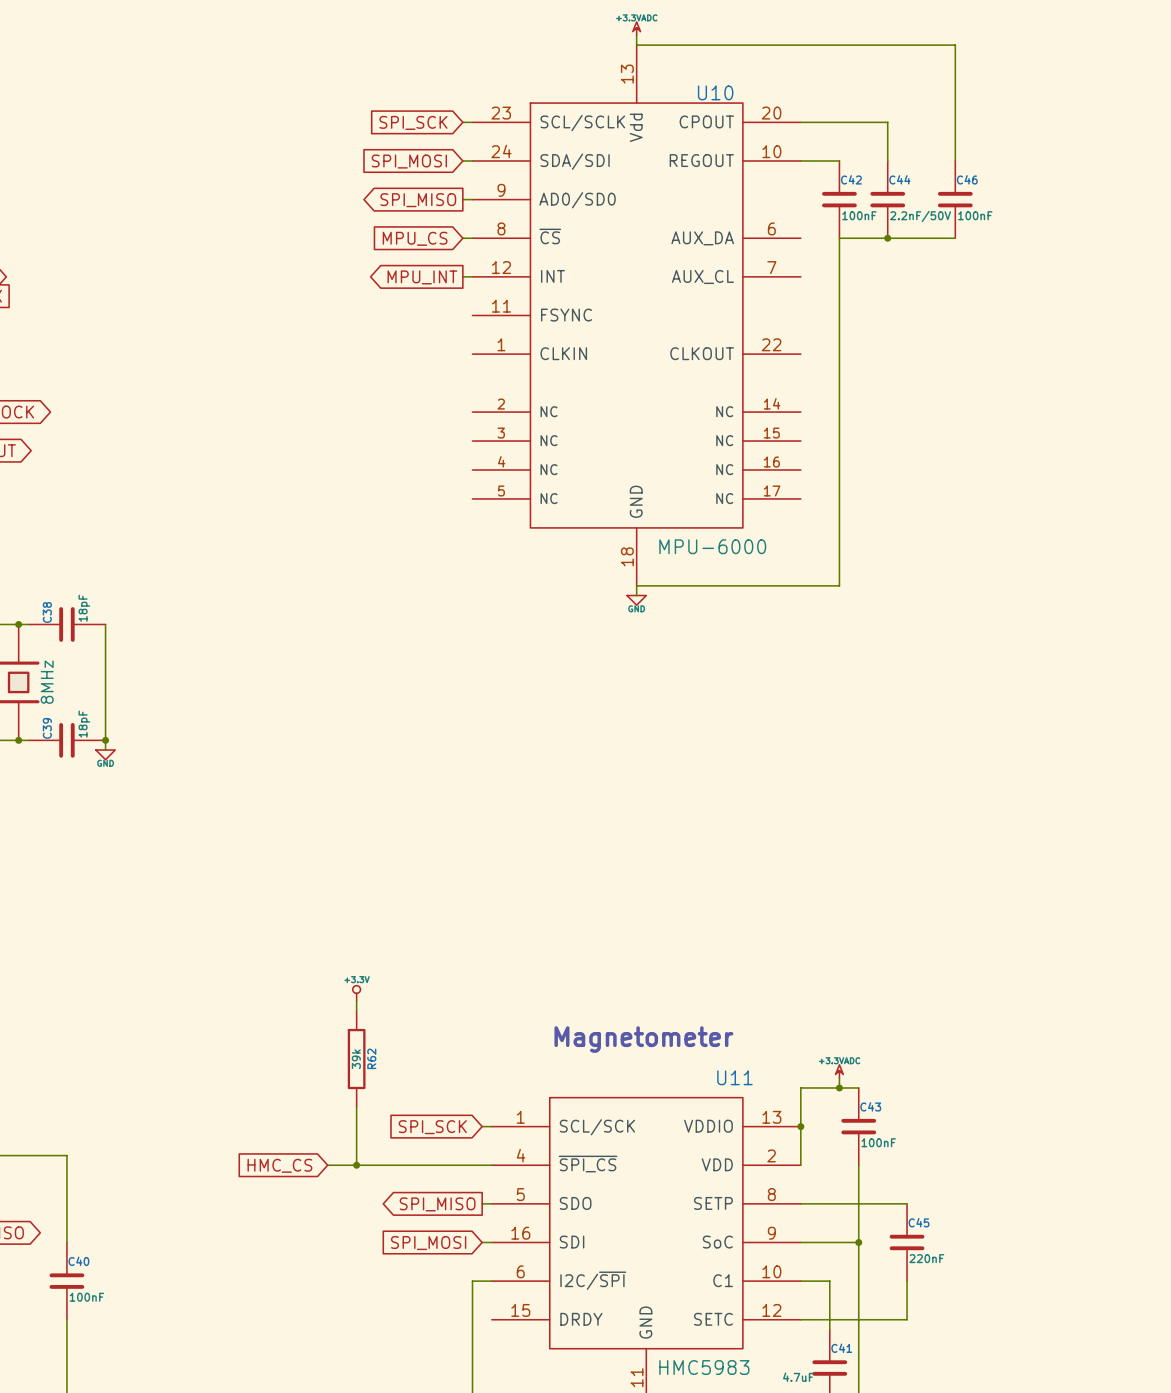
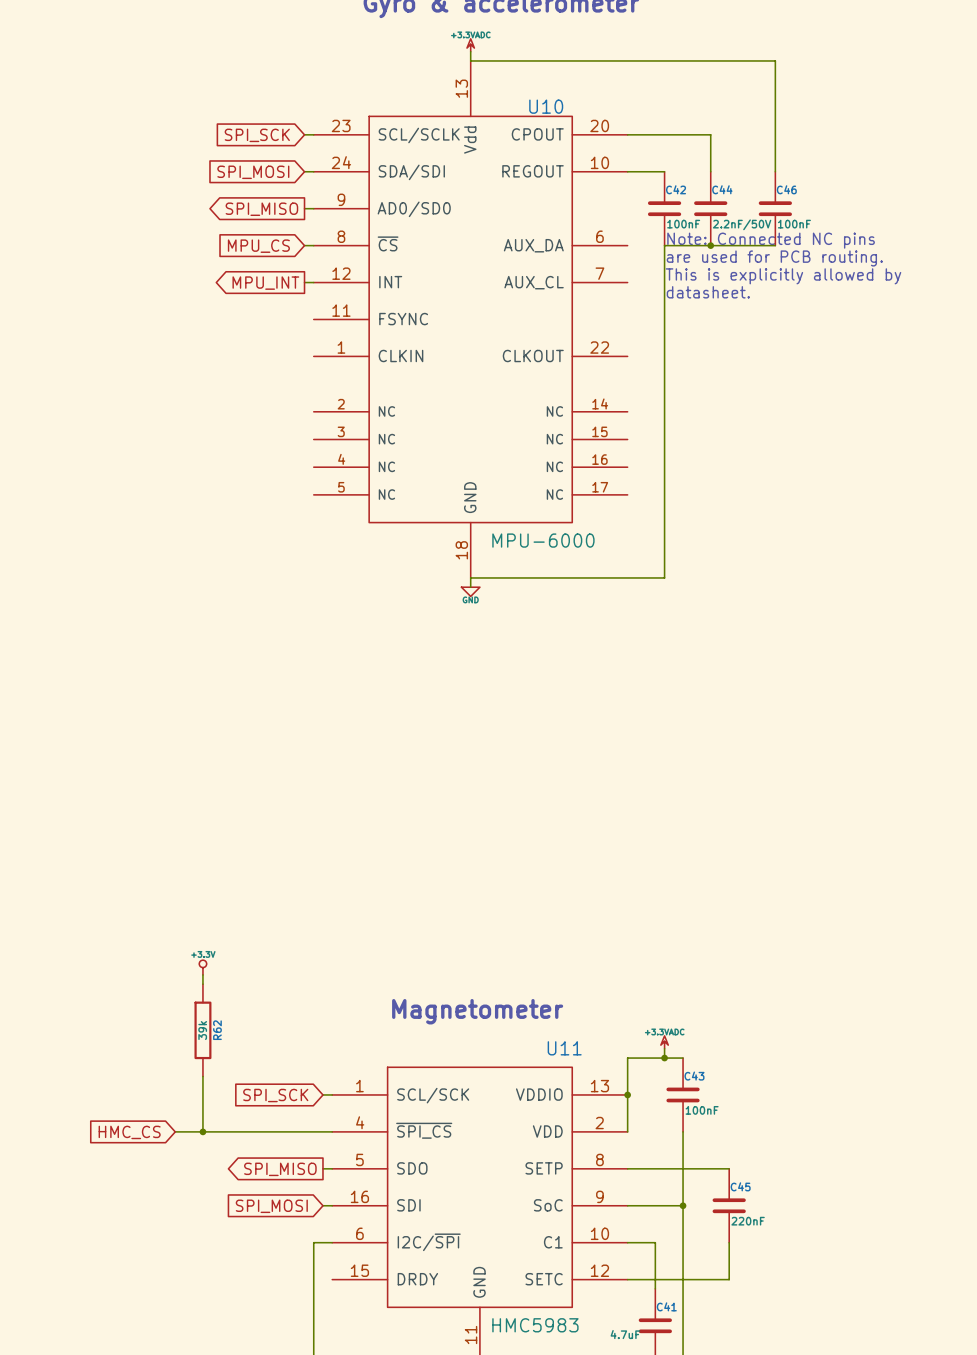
text: none -> Note: Connected NC pins (771, 240)
text: none -> are used for PCB routing. (774, 258)
text: none -> This is explicitly allowed by (783, 276)
text: none -> datasheet. (708, 292)

